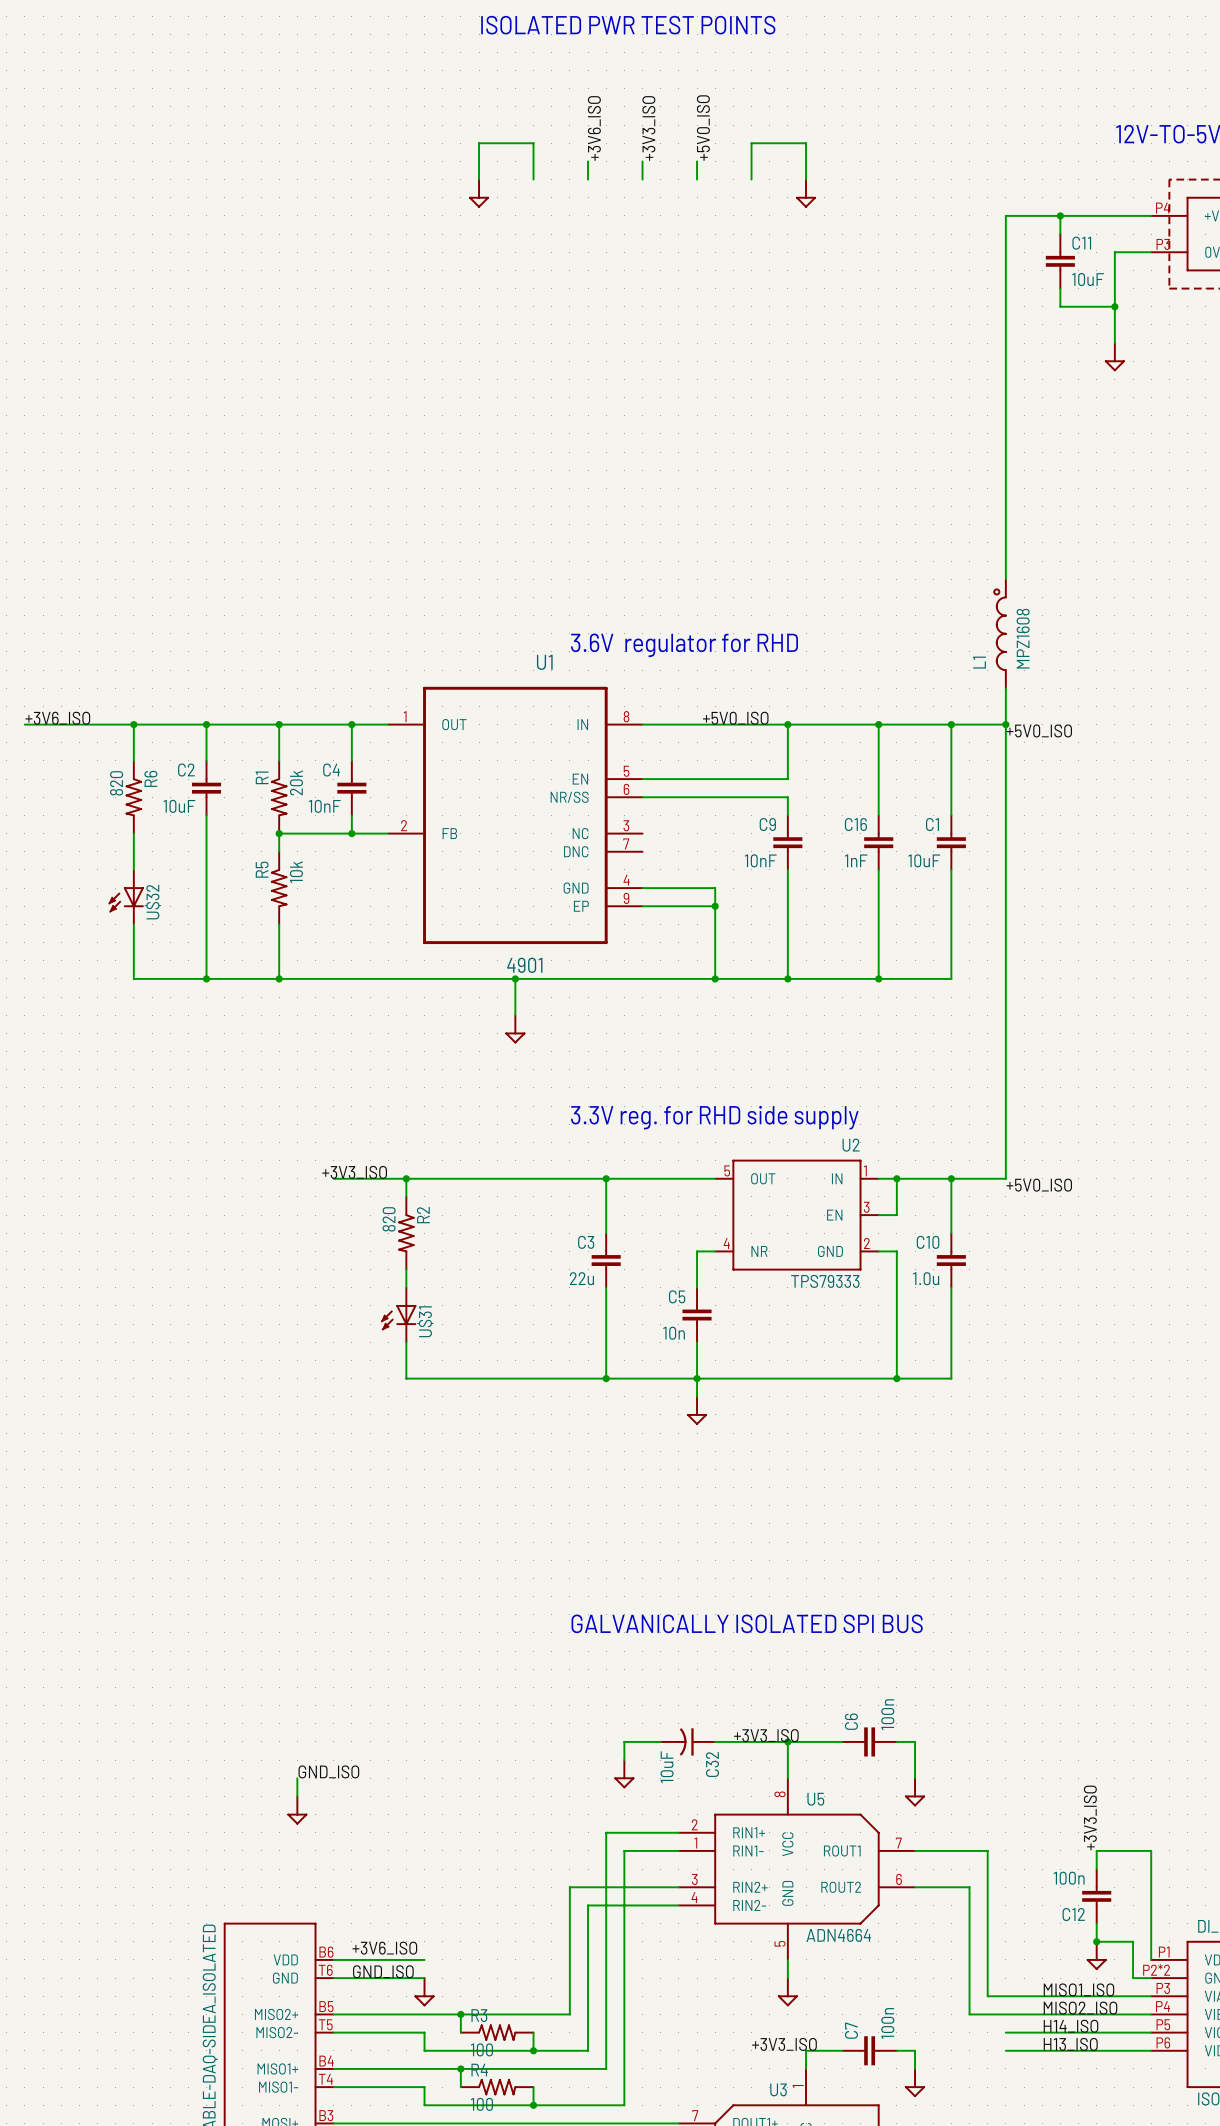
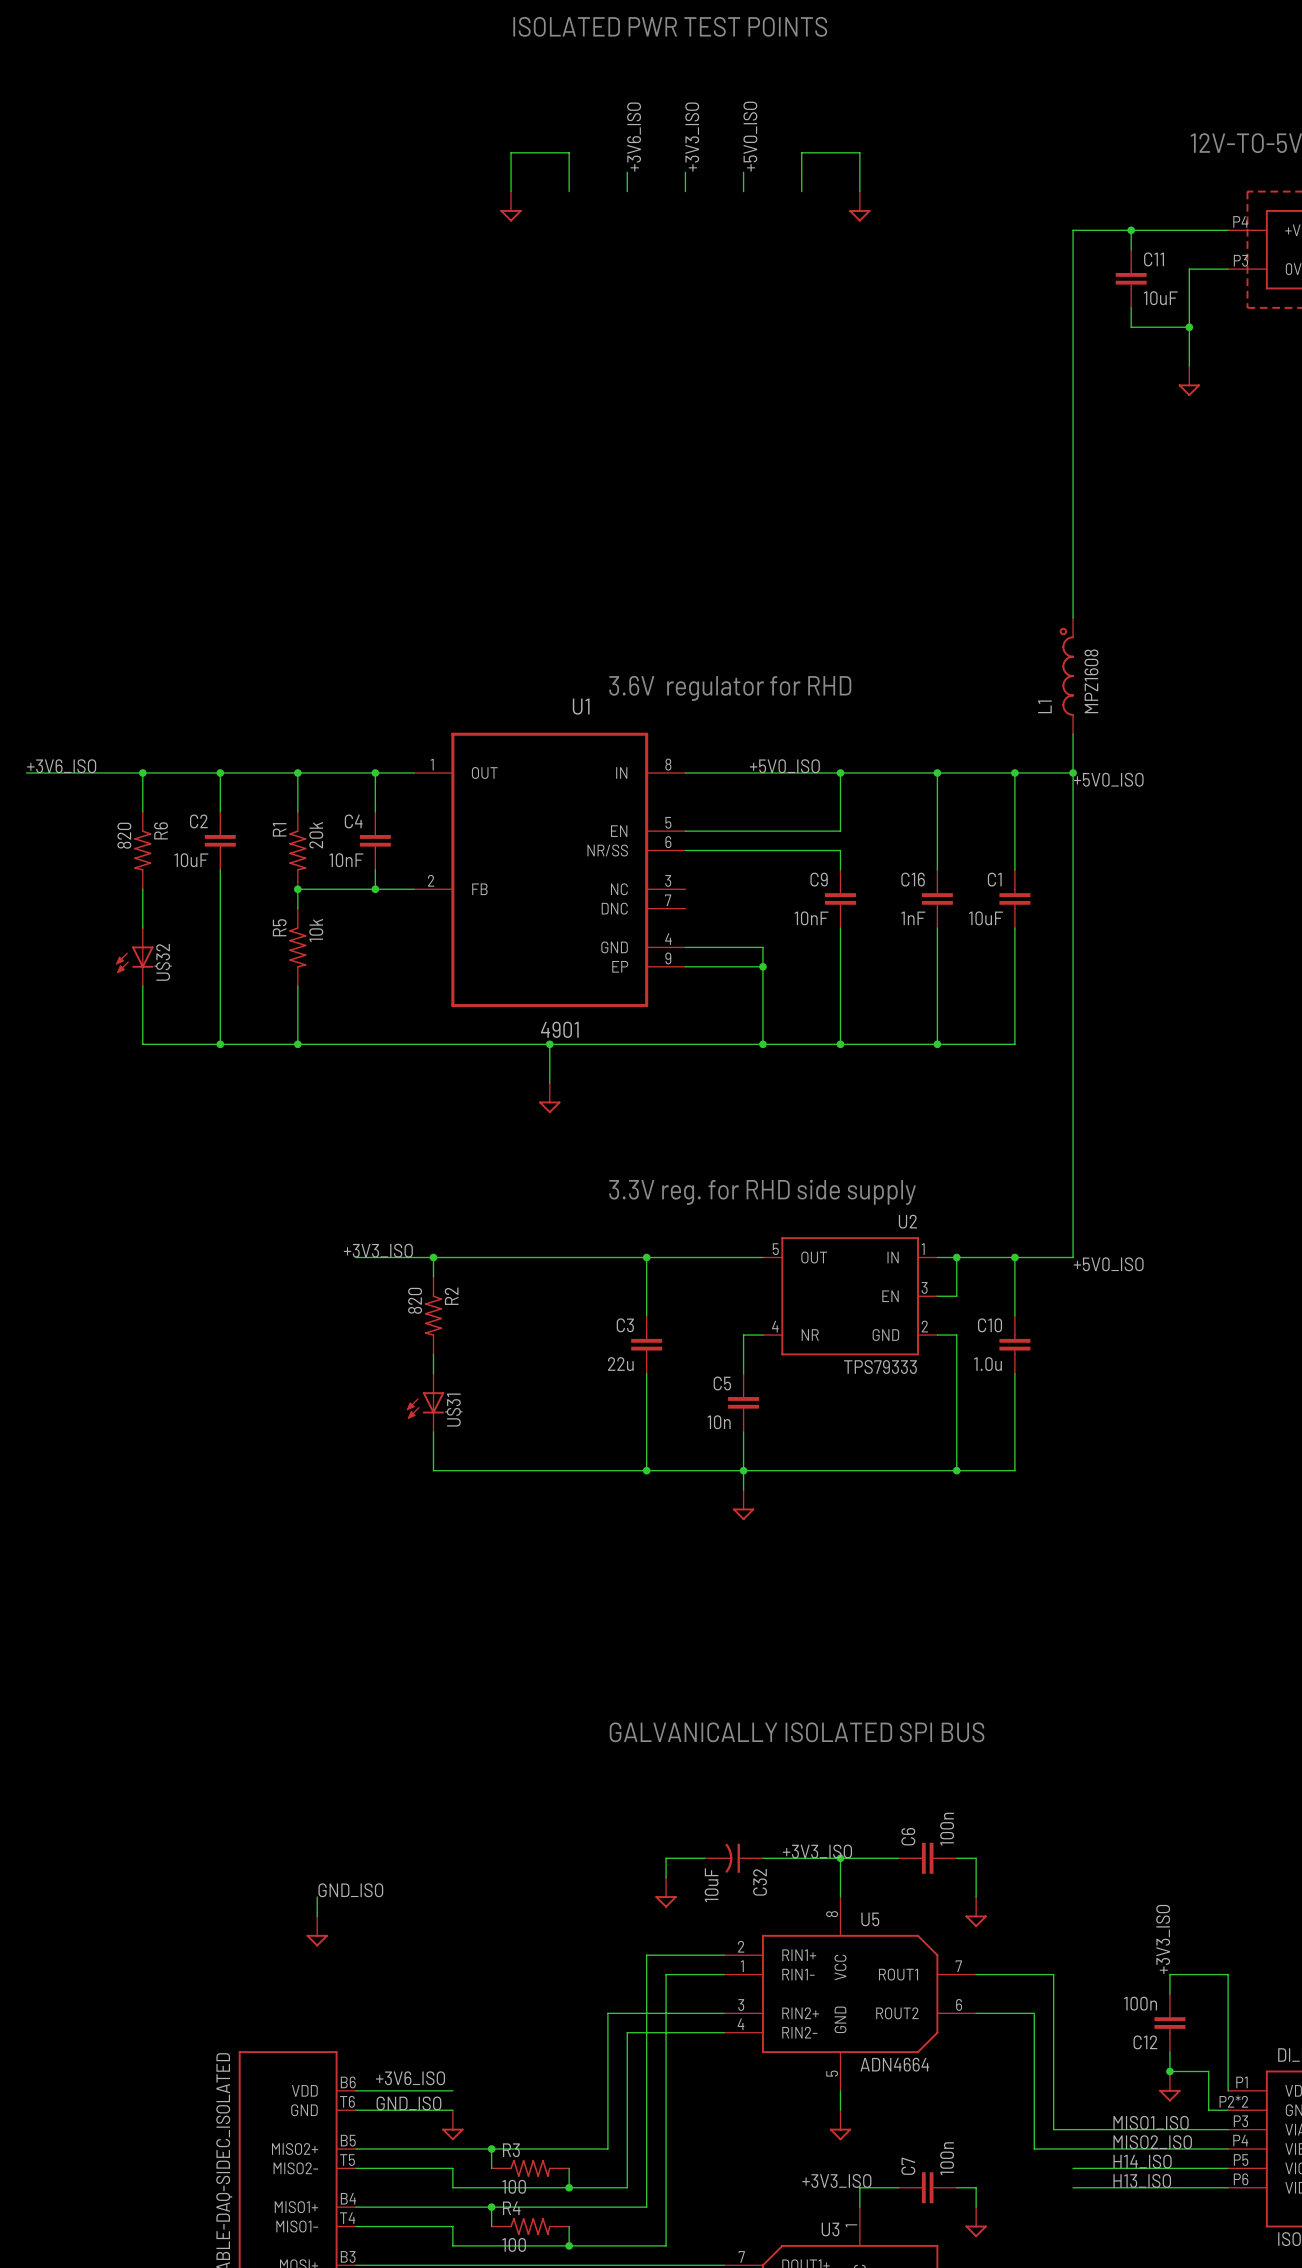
A_ISOLATED name: A_ISOLATED (209, 1969) -> C_ISOLATED (223, 2100)

